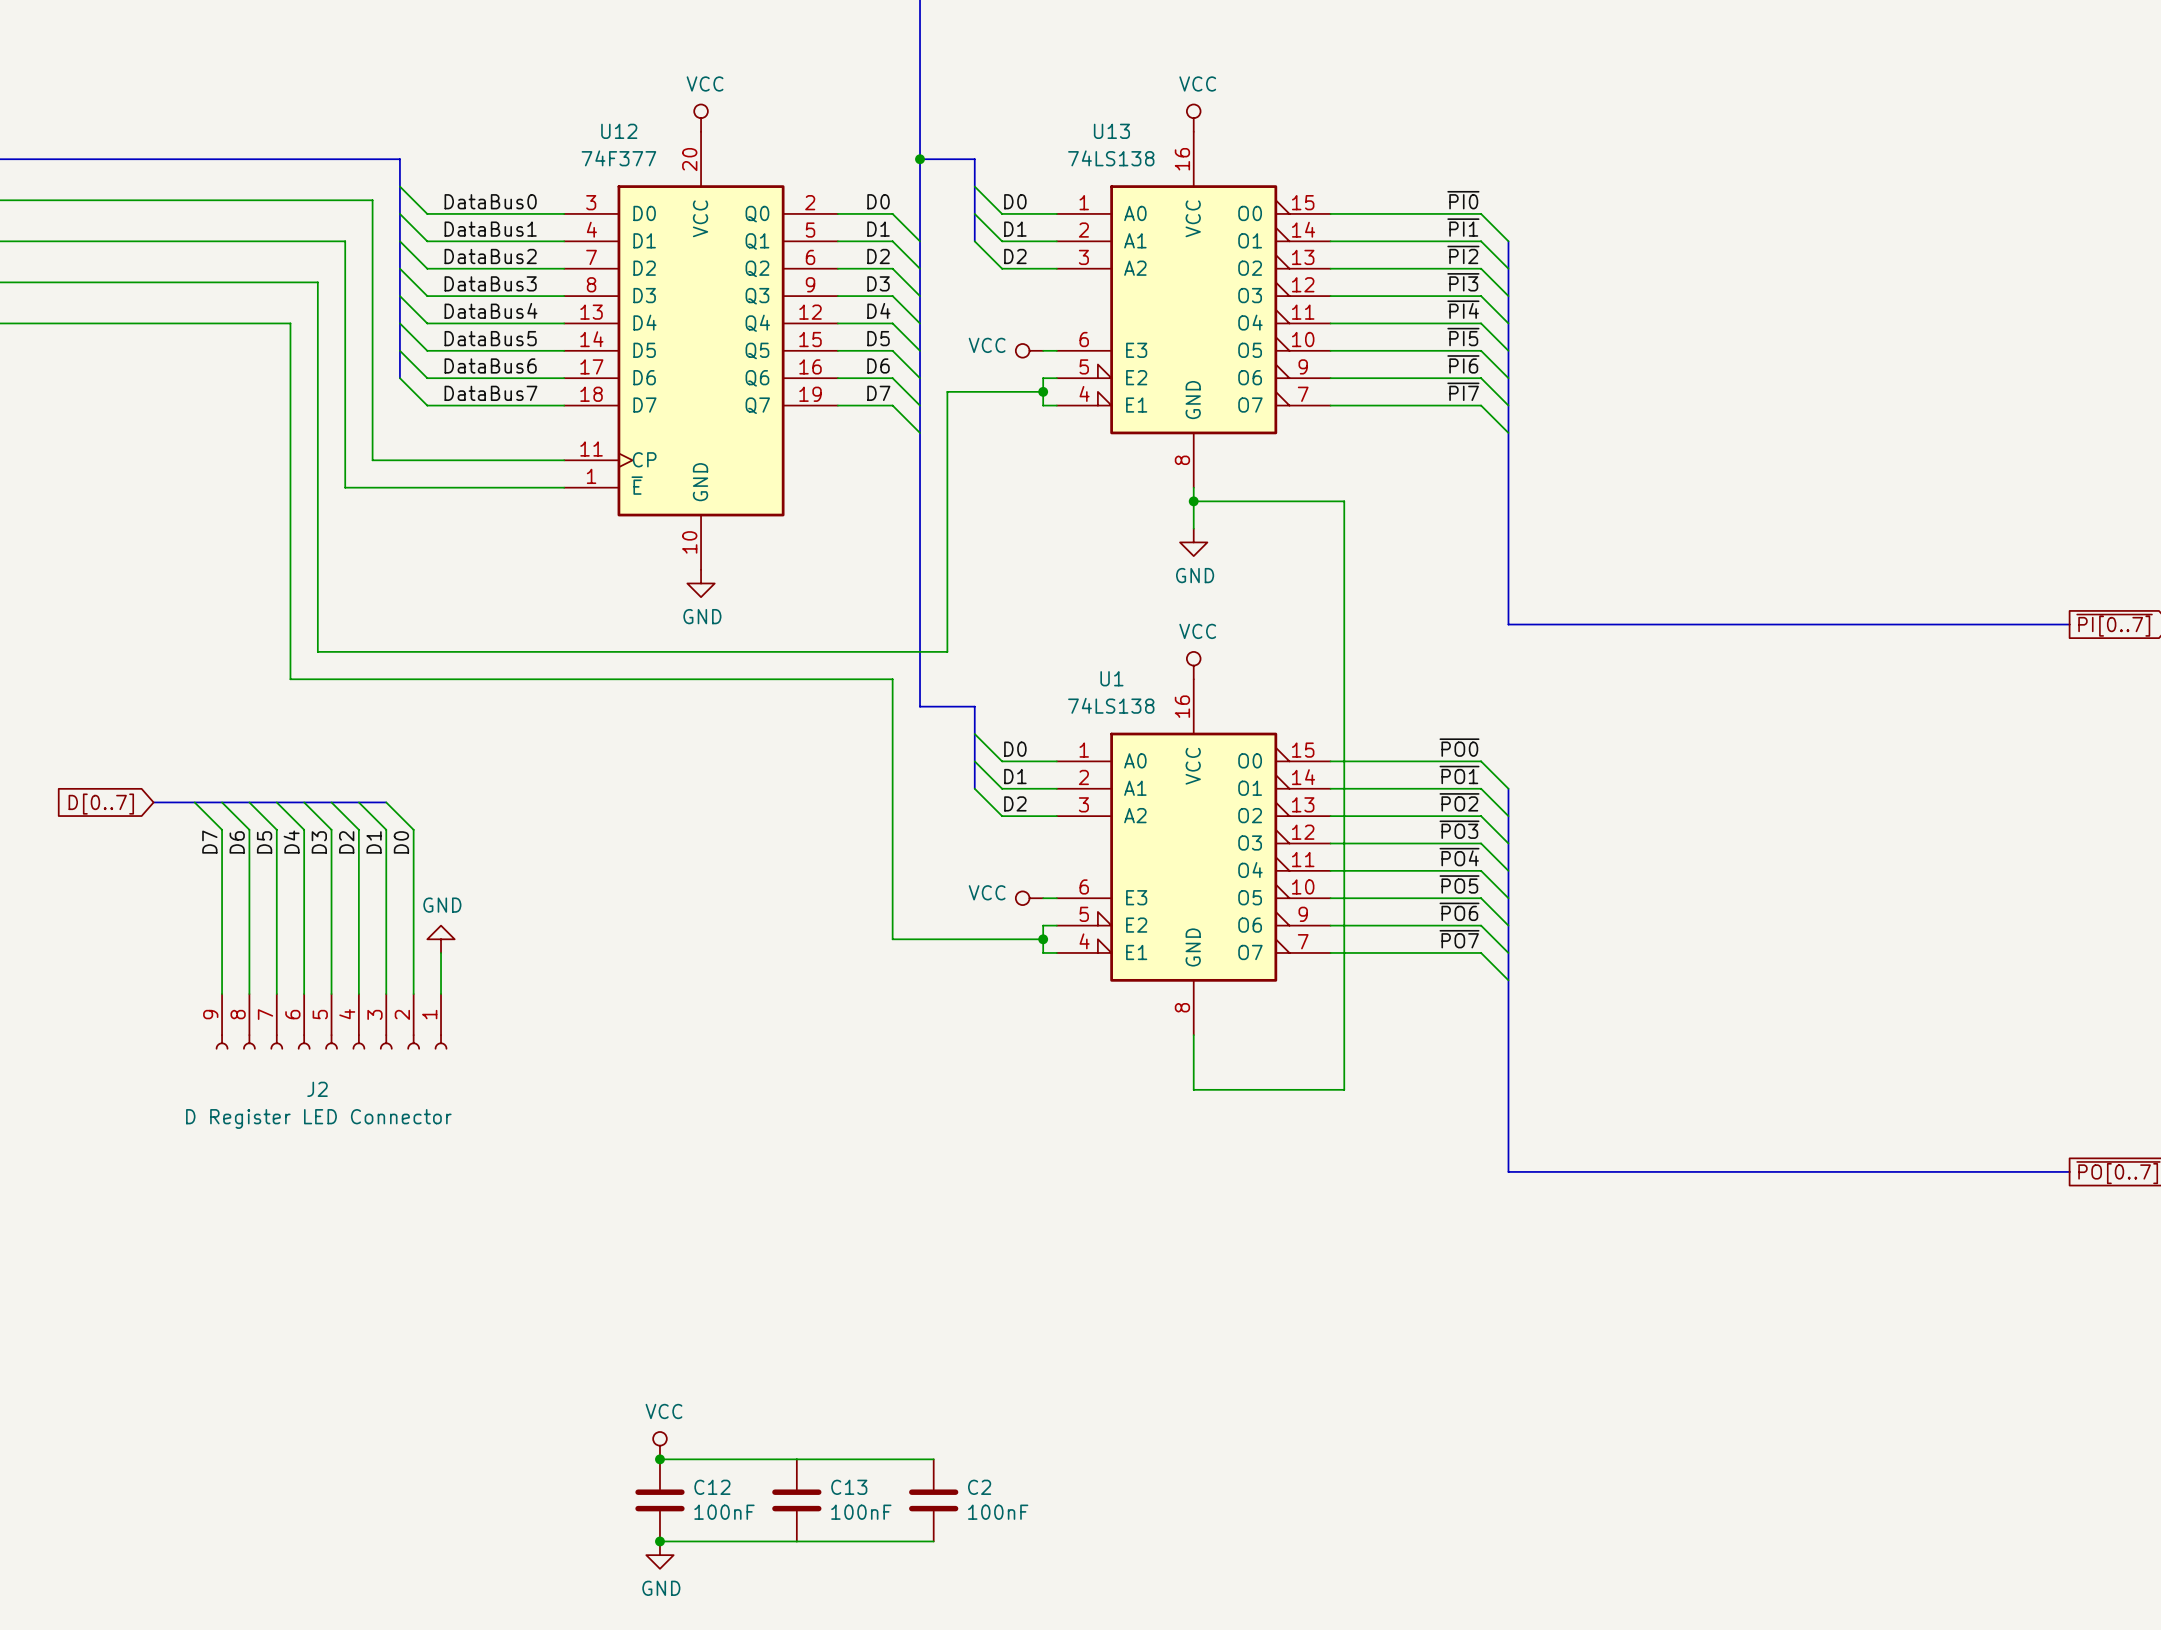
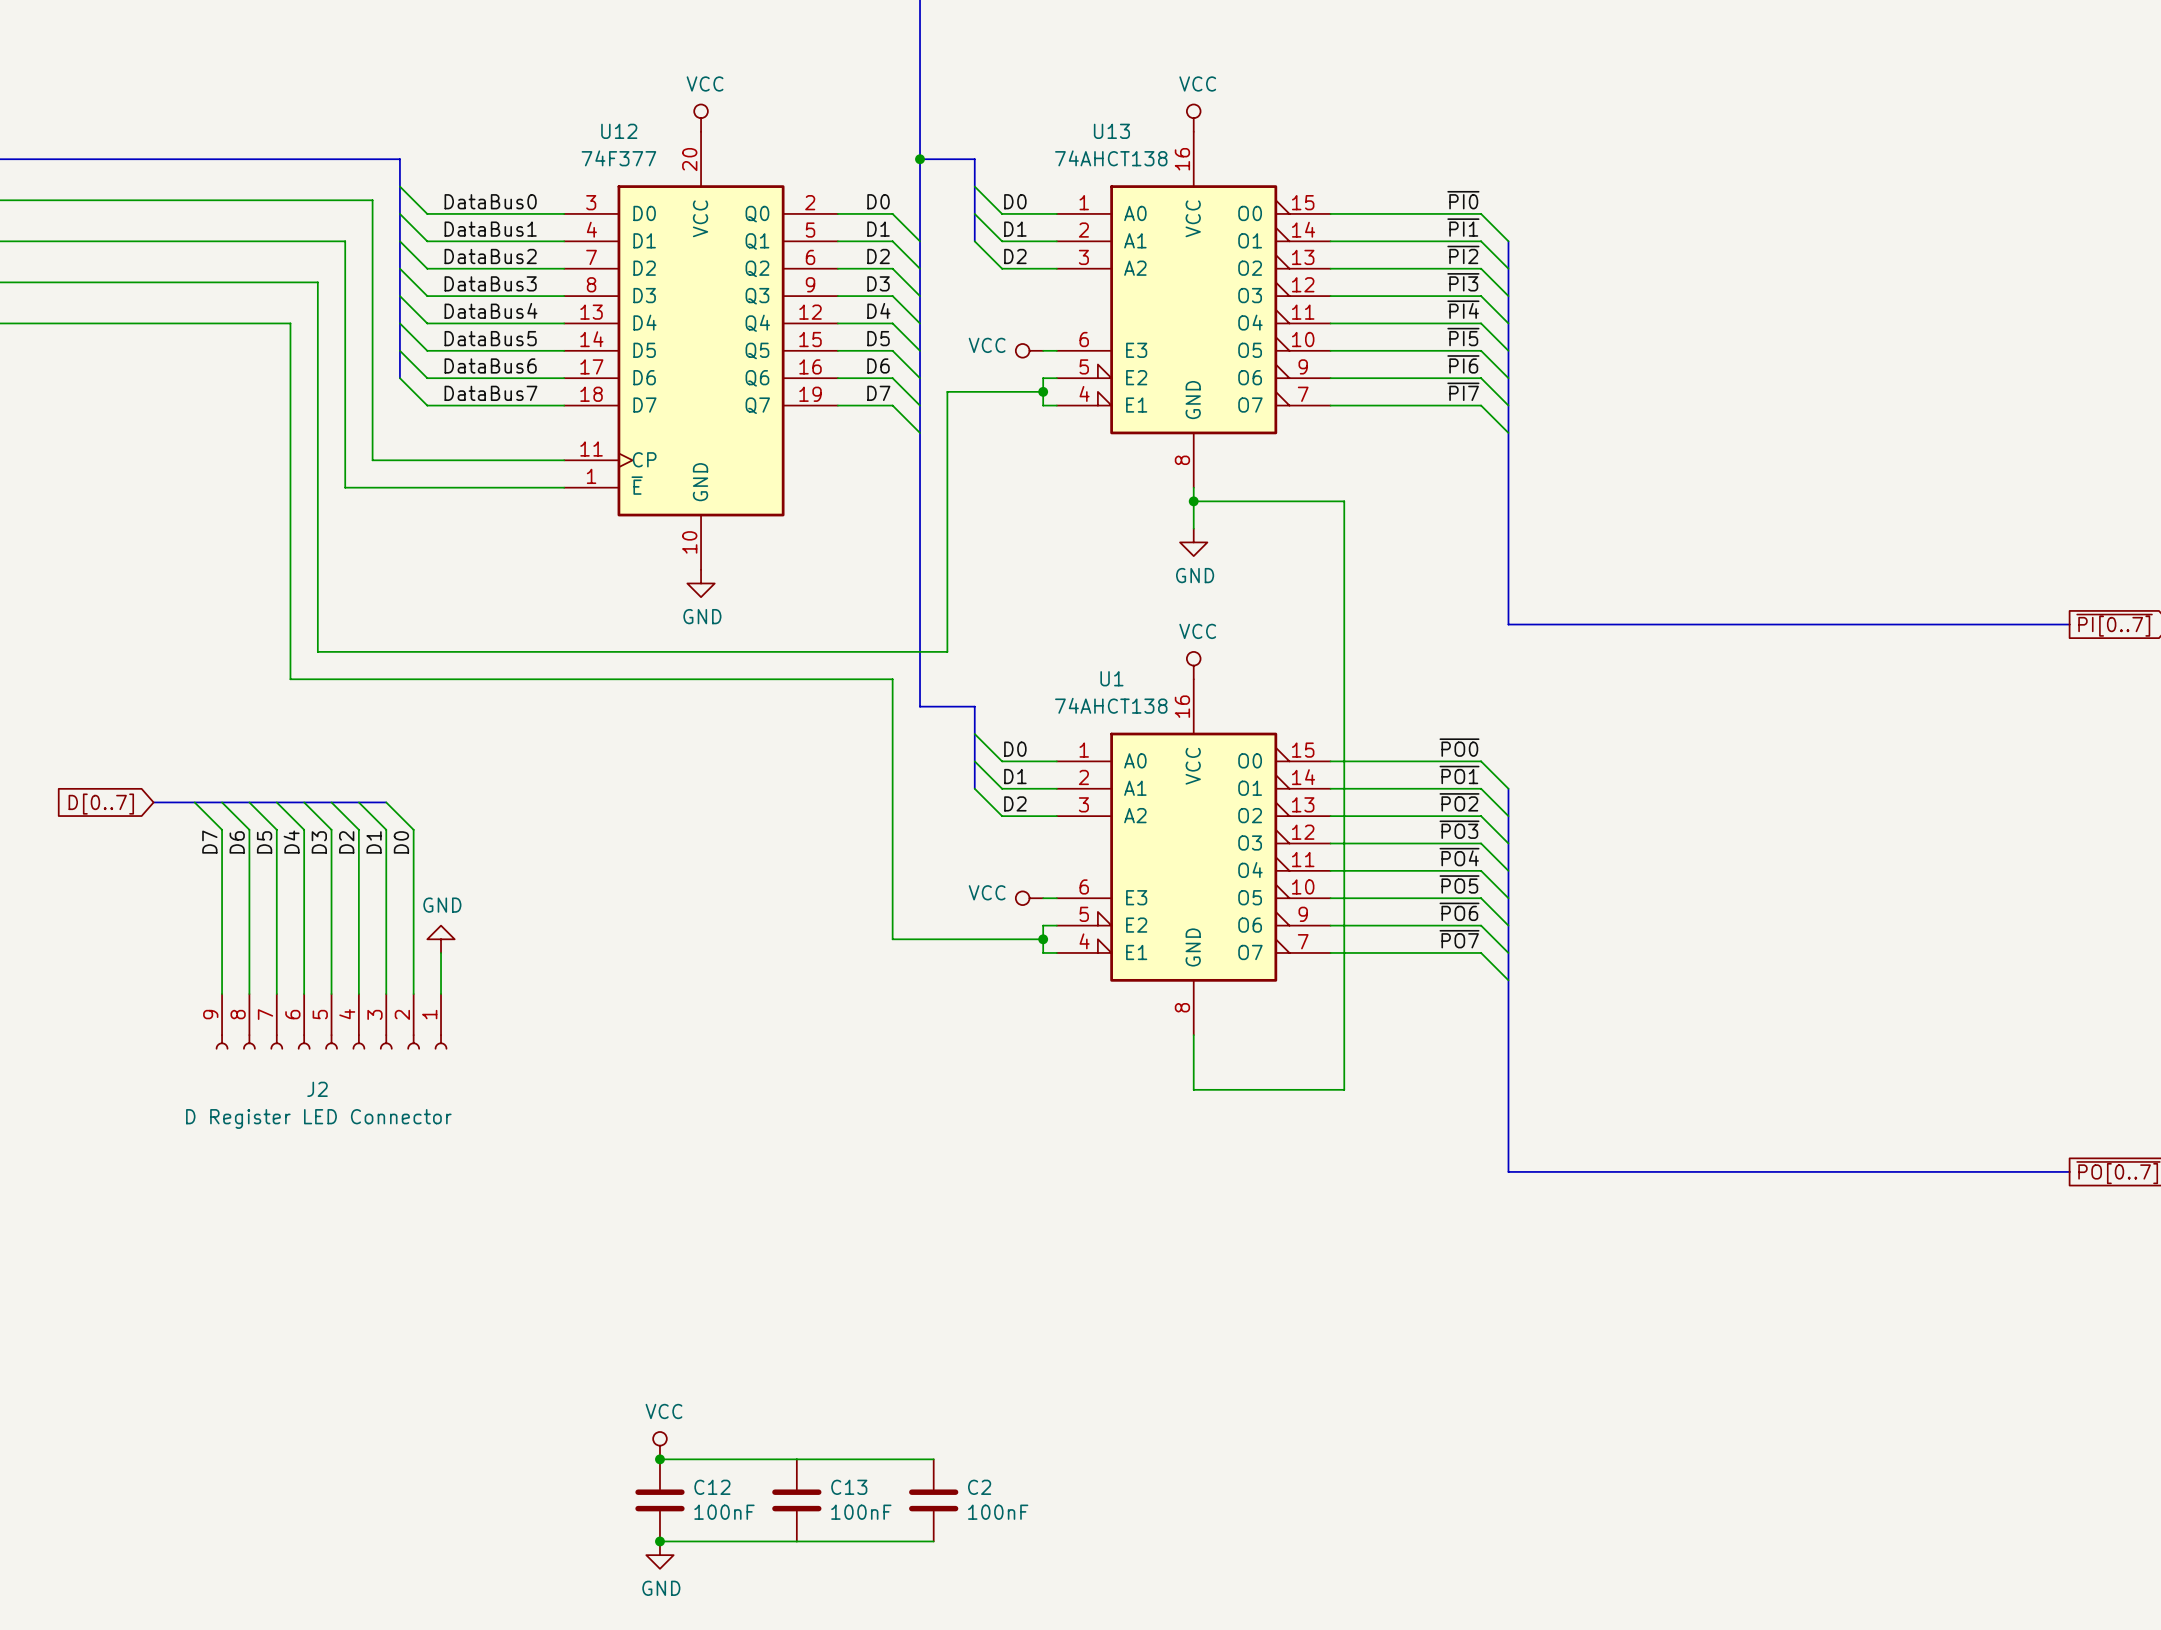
U13 value: 74LS138 (1111, 158) -> 74AHCT138 (1111, 158)
U1 value: 74LS138 (1111, 705) -> 74AHCT138 (1111, 705)

